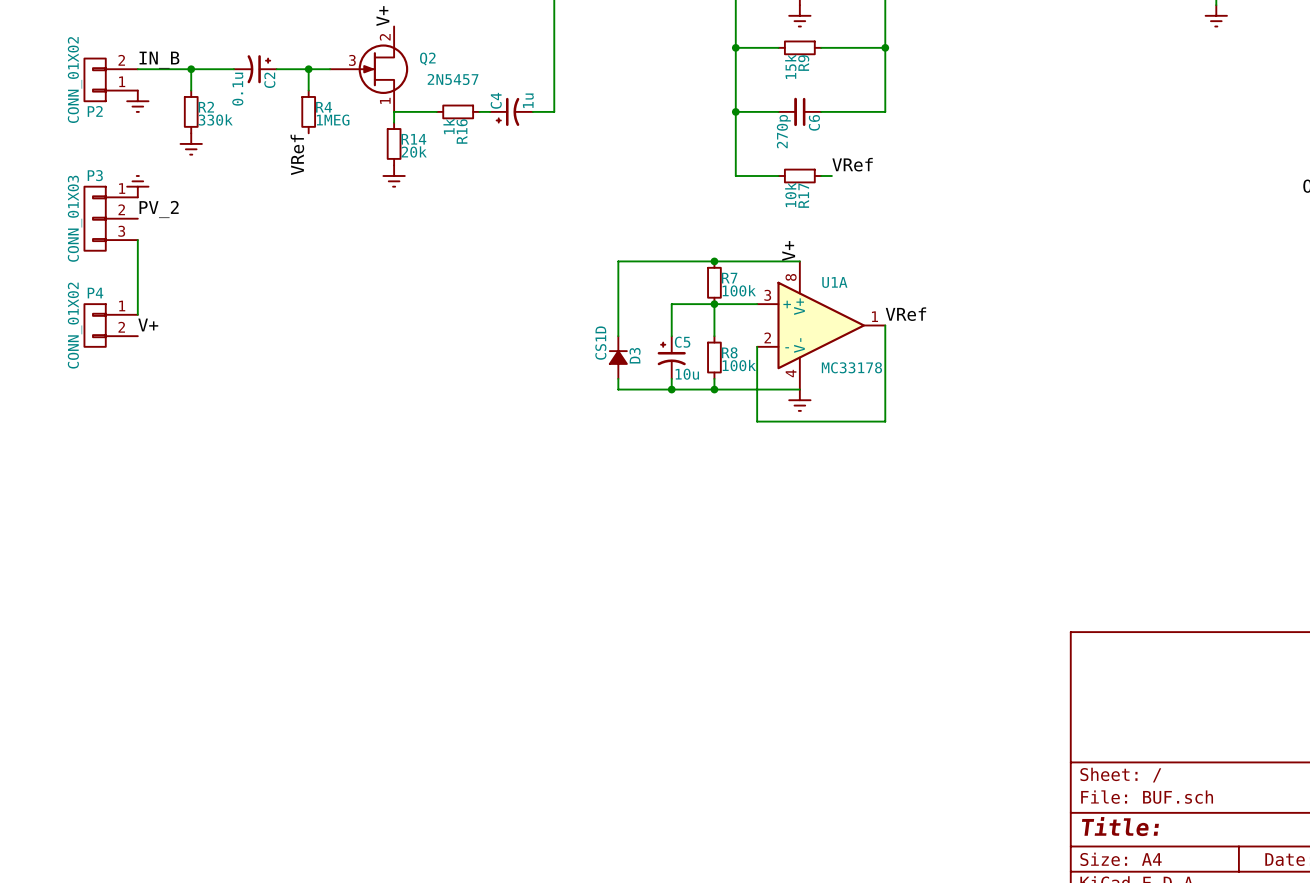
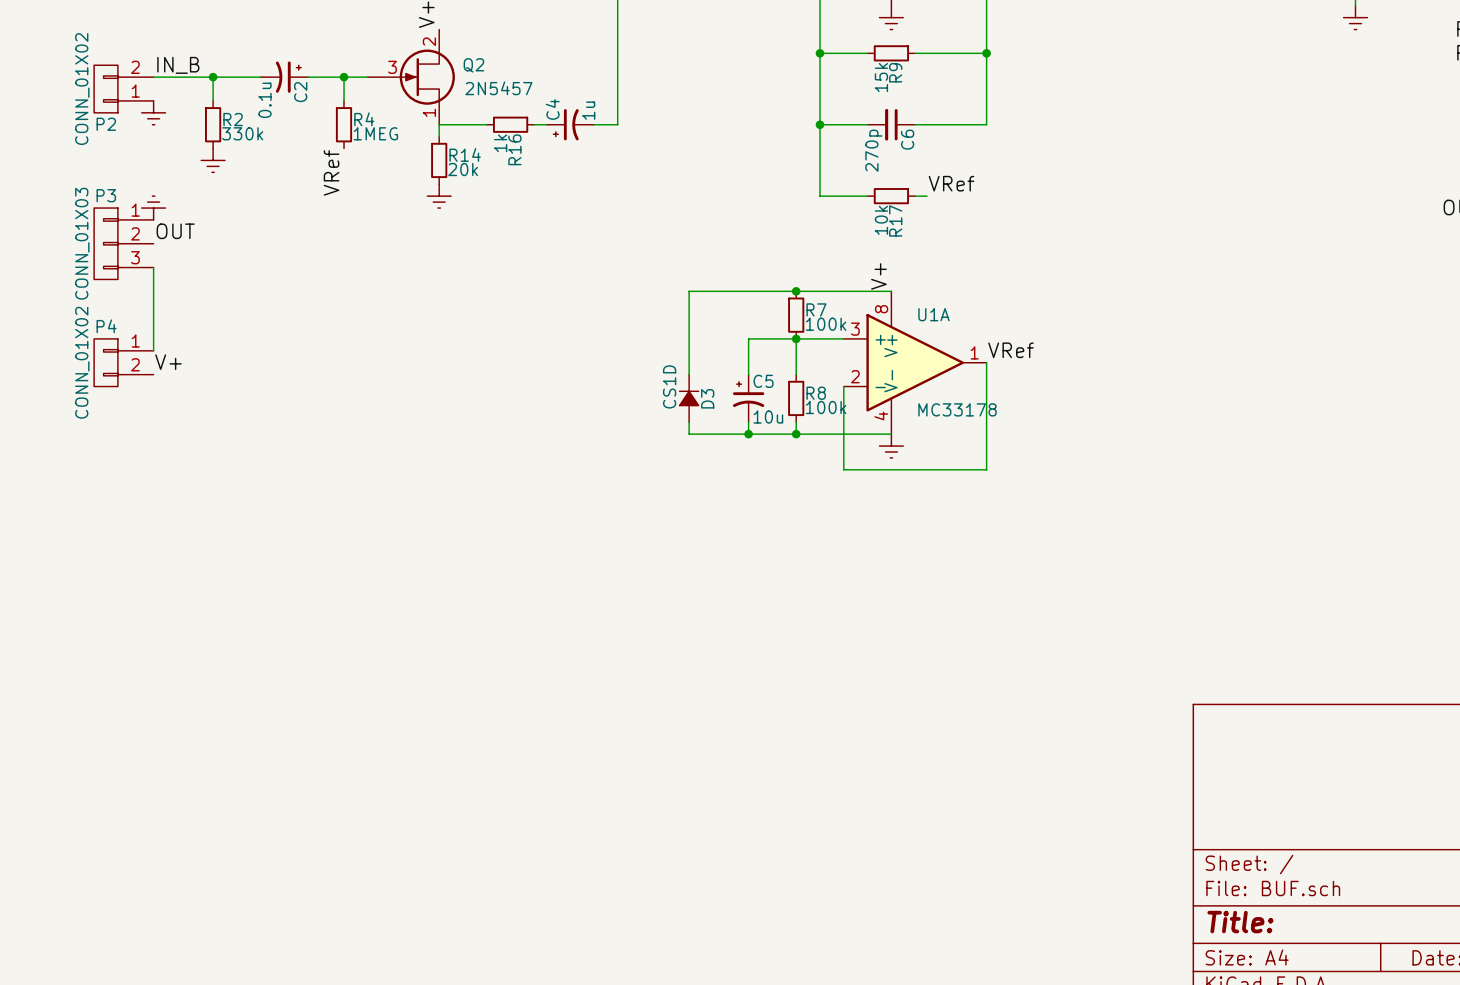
label: PV_2 (159, 209) -> OUT (175, 231)

